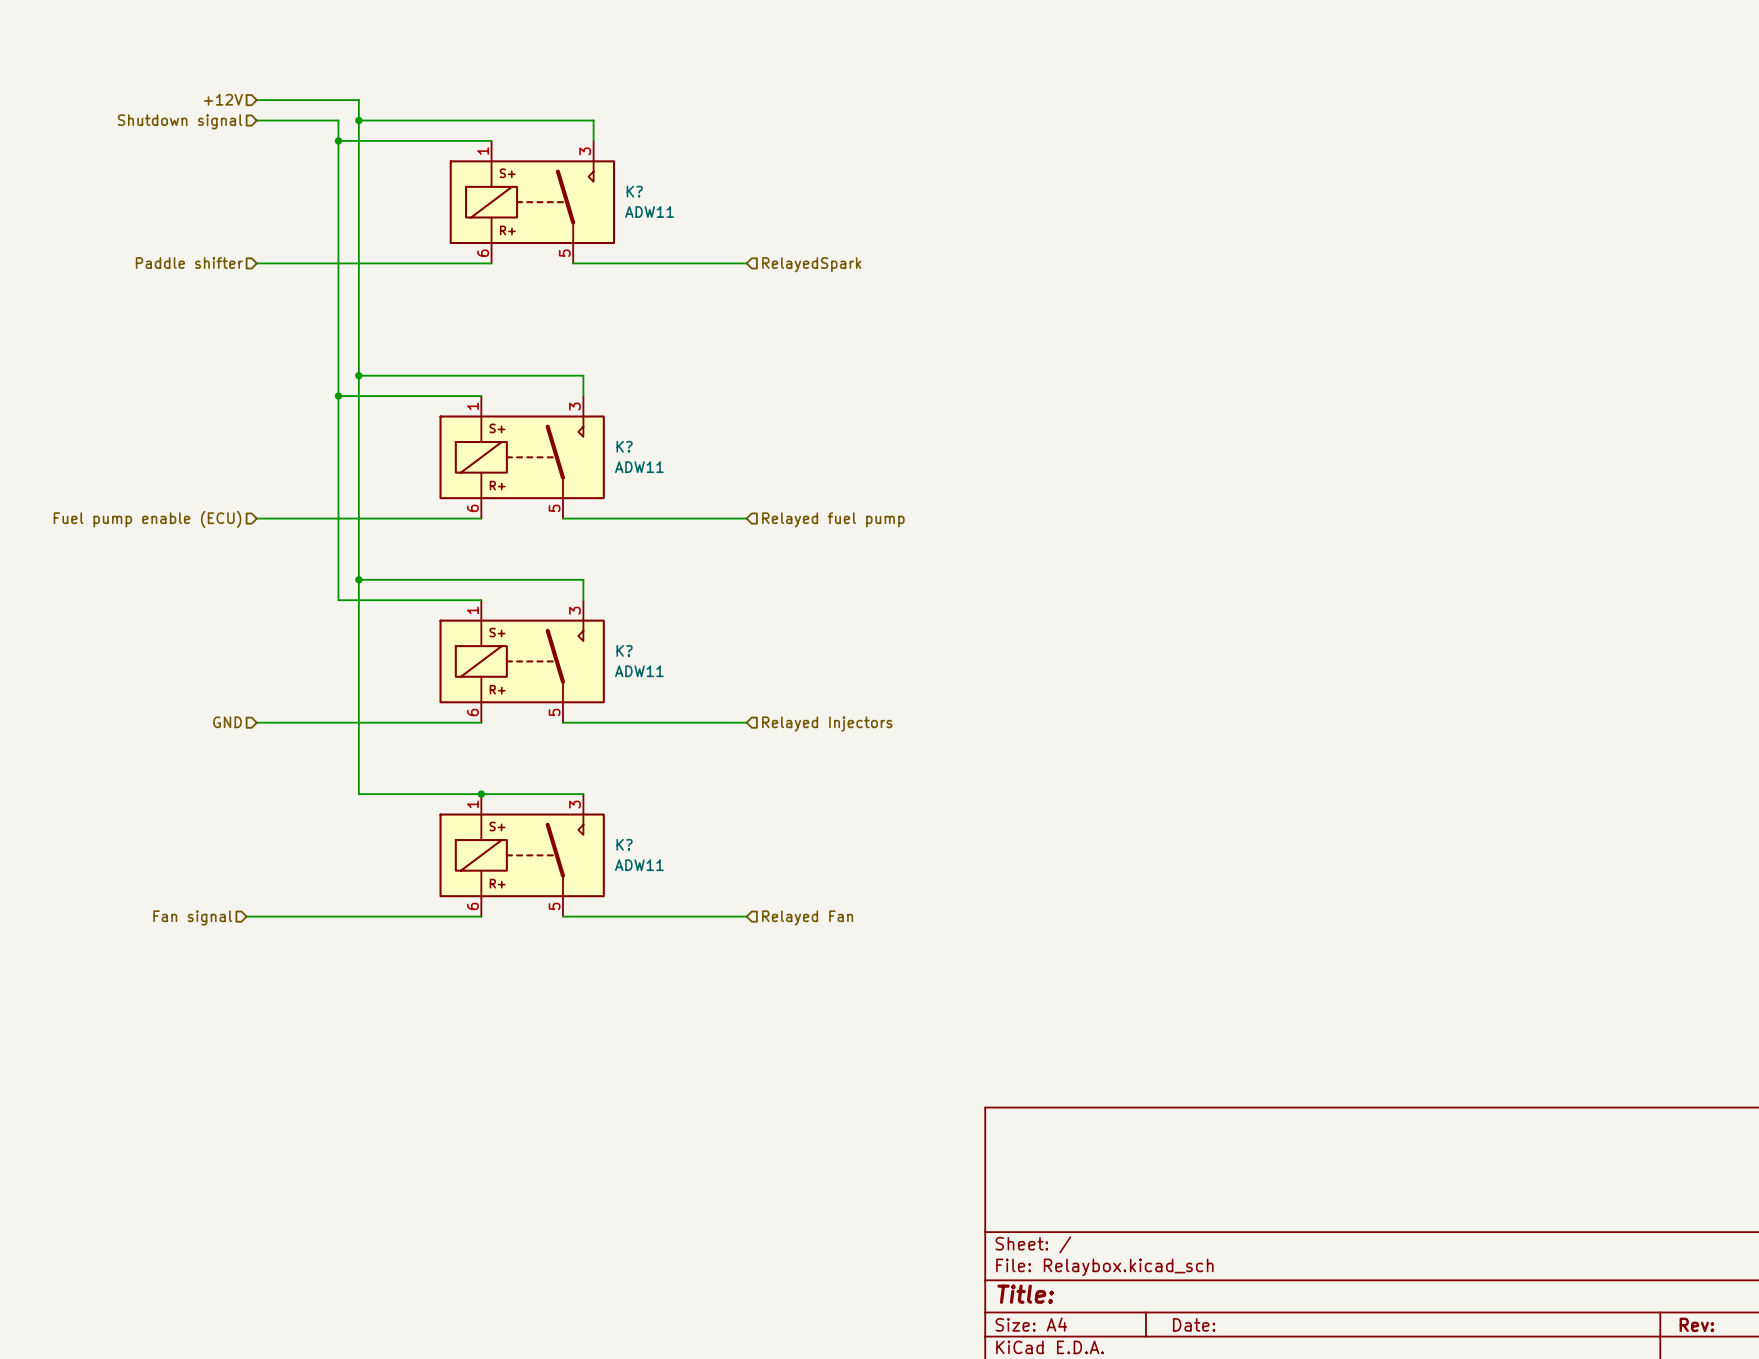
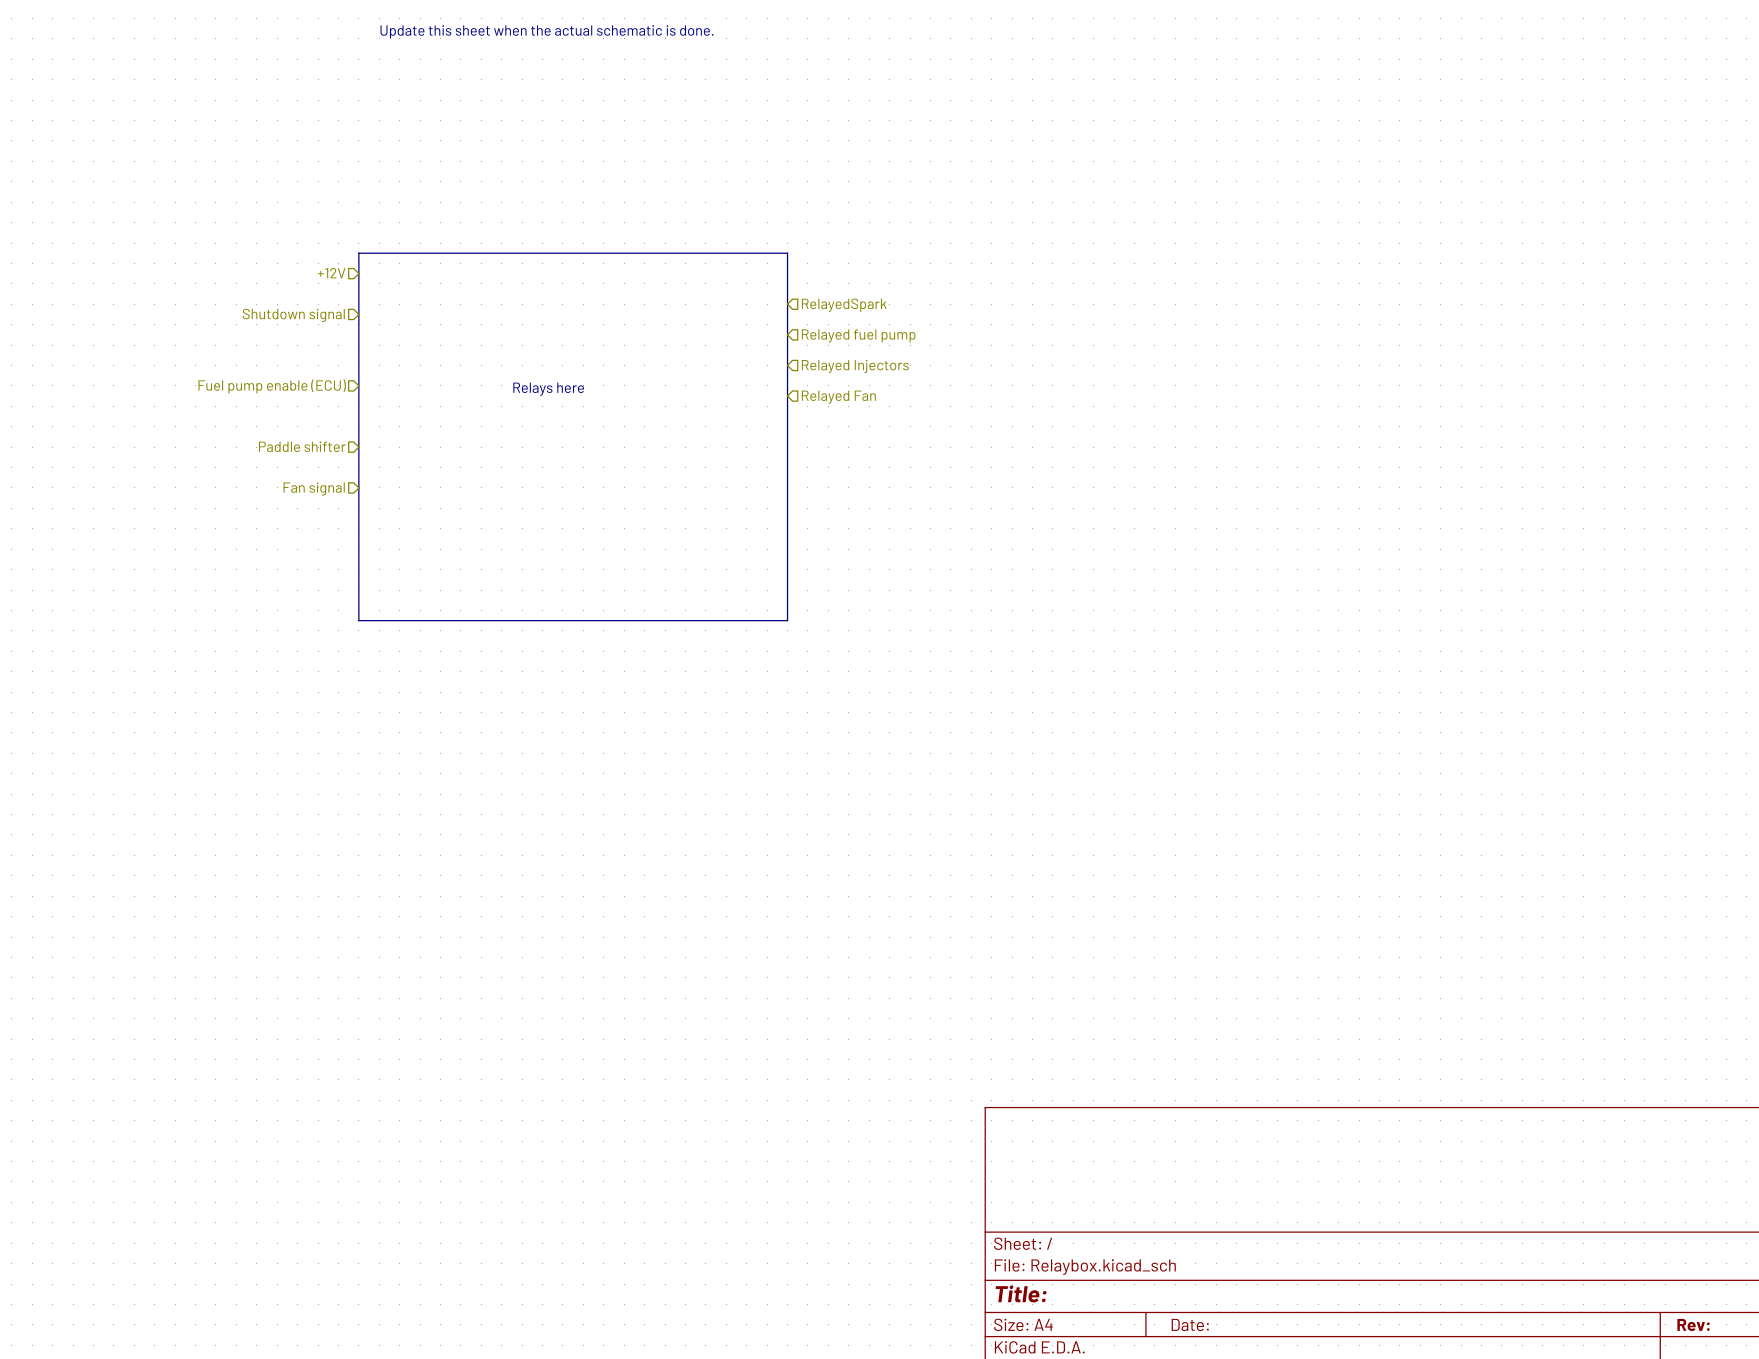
text: none -> Update this sheet when the actual schematic is done. (547, 31)
hierarchical label: +12V (223, 99) -> none
wire: (256, 100) (358, 100) (358, 794) (583, 794) -> none
wire: (256, 120) (338, 120) (338, 600) (481, 600) -> none
wire: (358, 120) (593, 120) (593, 140) -> none
junction: (358, 120) -> none
hierarchical label: Shutdown signal (180, 121) -> none
wire: (338, 140) (491, 140) -> none
junction: (338, 140) -> none
K?: ADW11 (532, 202) -> none
line: none -> (358, 253) (358, 620) (787, 620) (787, 253) (358, 253)
hierarchical label: Paddle shifter (189, 263) -> none
wire: (256, 263) (491, 263) -> none
wire: (573, 263) (746, 263) -> none
hierarchical label position: RelayedSpark (811, 264) -> RelayedSpark (844, 305)
hierarchical label: none -> +12V (331, 273)
hierarchical label: none -> Shutdown signal (293, 315)
hierarchical label: none -> Relayed Injectors (855, 366)
wire: (358, 375) (583, 375) (583, 396) -> none
junction: (358, 375) -> none
text: none -> Relays here (548, 389)
wire: (338, 396) (481, 396) -> none
junction: (338, 396) -> none
hierarchical label: none -> Relayed Fan (838, 397)
hierarchical label: none -> Paddle shifter (302, 446)
K?: ADW11 (522, 457) -> none
hierarchical label: none -> Fan signal (314, 488)
wire: (256, 518) (481, 518) -> none
wire: (562, 518) (746, 518) -> none
hierarchical label position: Fuel pump enable (ECU) (147, 519) -> Fuel pump enable (ECU) (272, 386)
hierarchical label position: Relayed fuel pump (833, 519) -> Relayed fuel pump (858, 335)
wire: (358, 579) (583, 579) (583, 600) -> none
junction: (358, 579) -> none
K?: ADW11 (522, 661) -> none
hierarchical label: GND (227, 722) -> none
wire: (256, 722) (481, 722) -> none
wire: (562, 722) (746, 722) -> none
hierarchical label: Relayed Injectors (827, 724) -> none
junction: (481, 794) -> none
K?: ADW11 (522, 855) -> none
wire: (246, 916) (481, 916) -> none
wire: (562, 916) (746, 916) -> none
hierarchical label: Fan signal (192, 917) -> none
hierarchical label: Relayed Fan (807, 917) -> none

